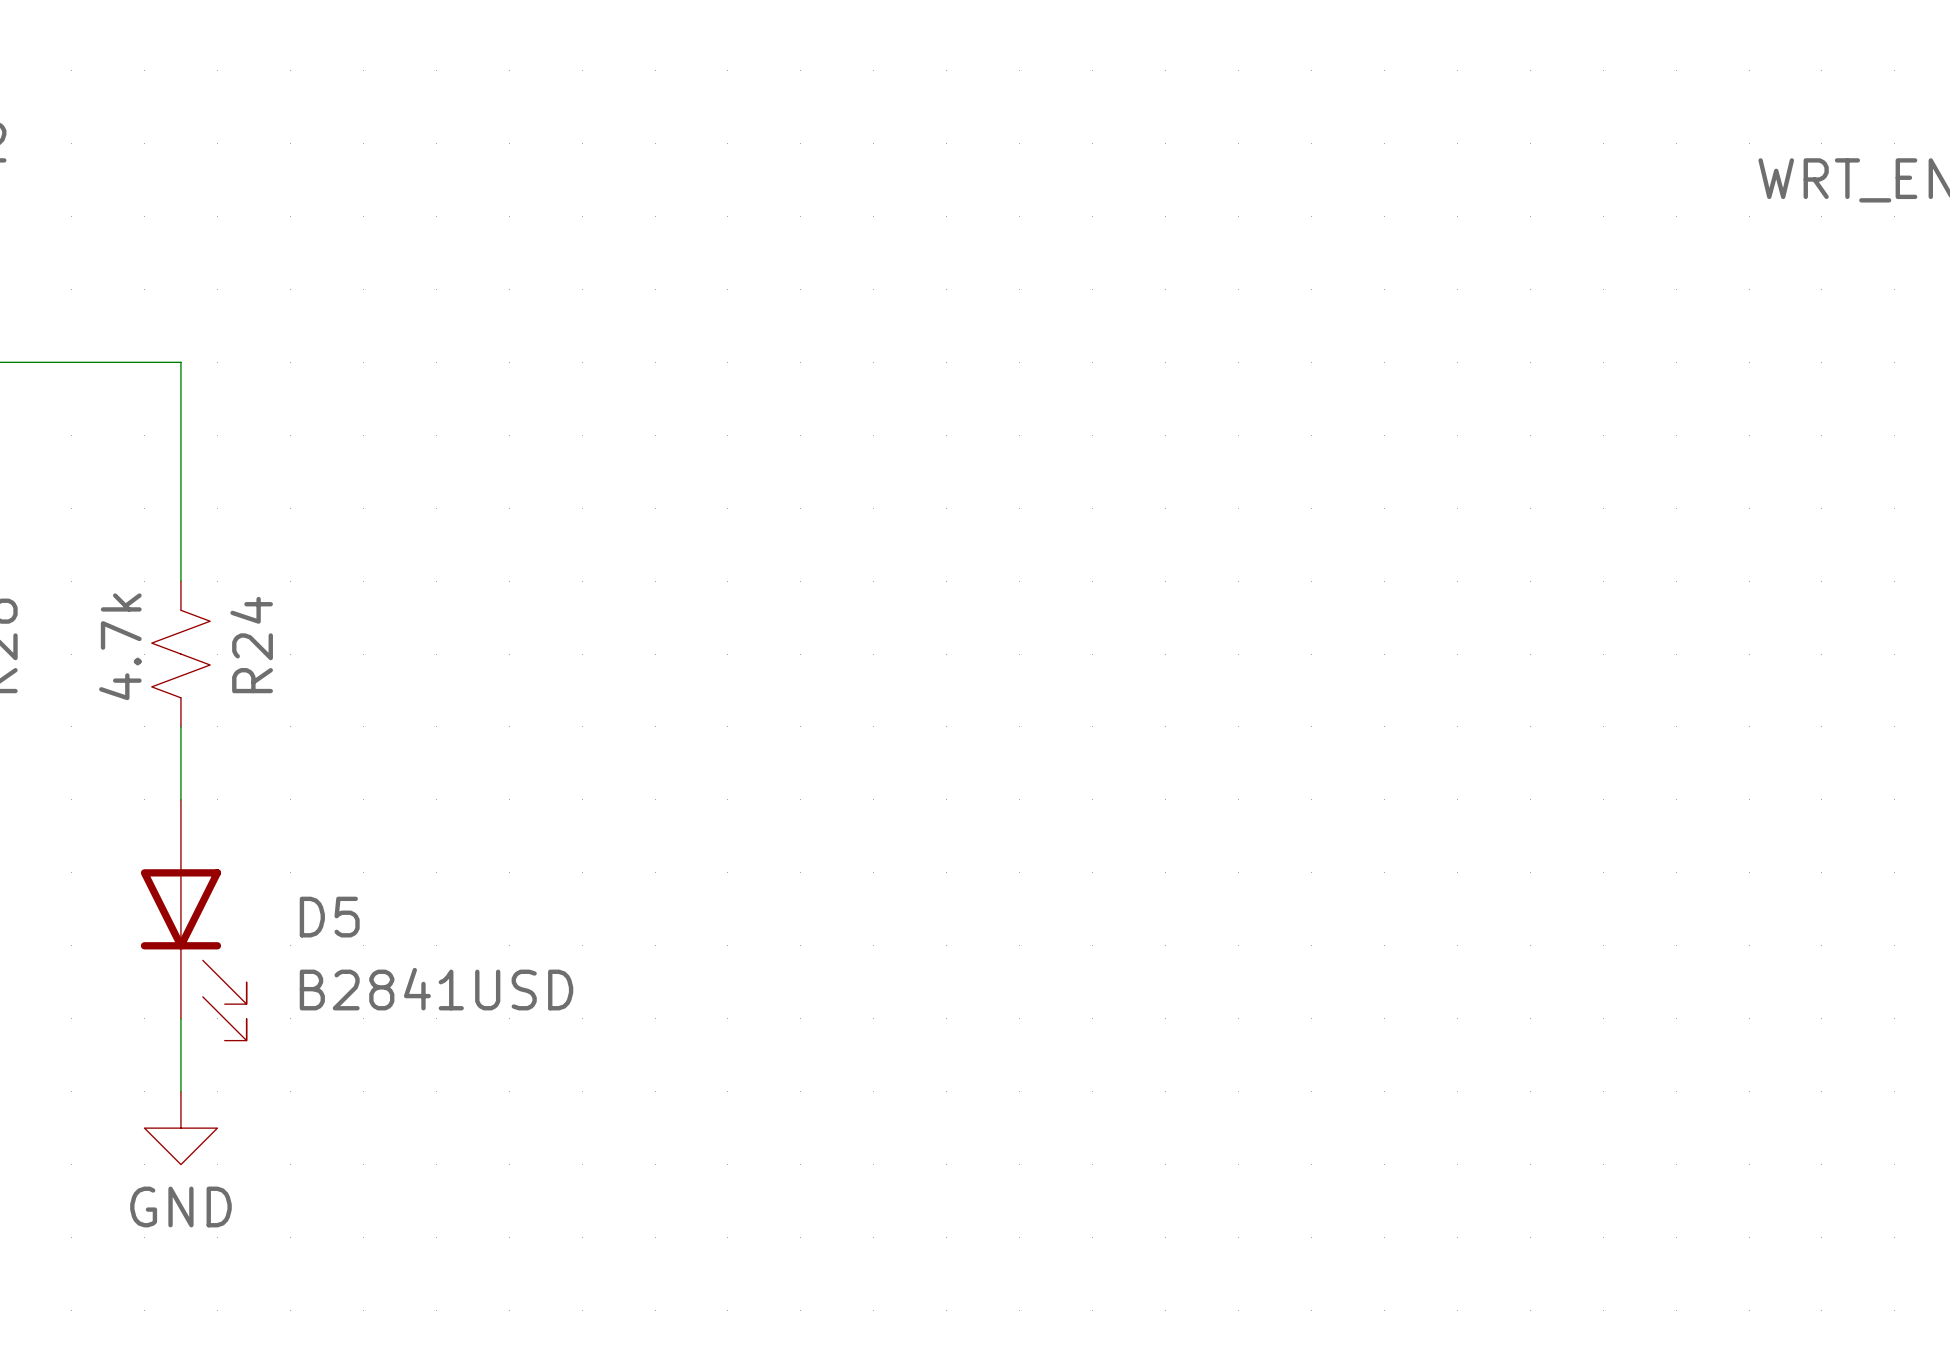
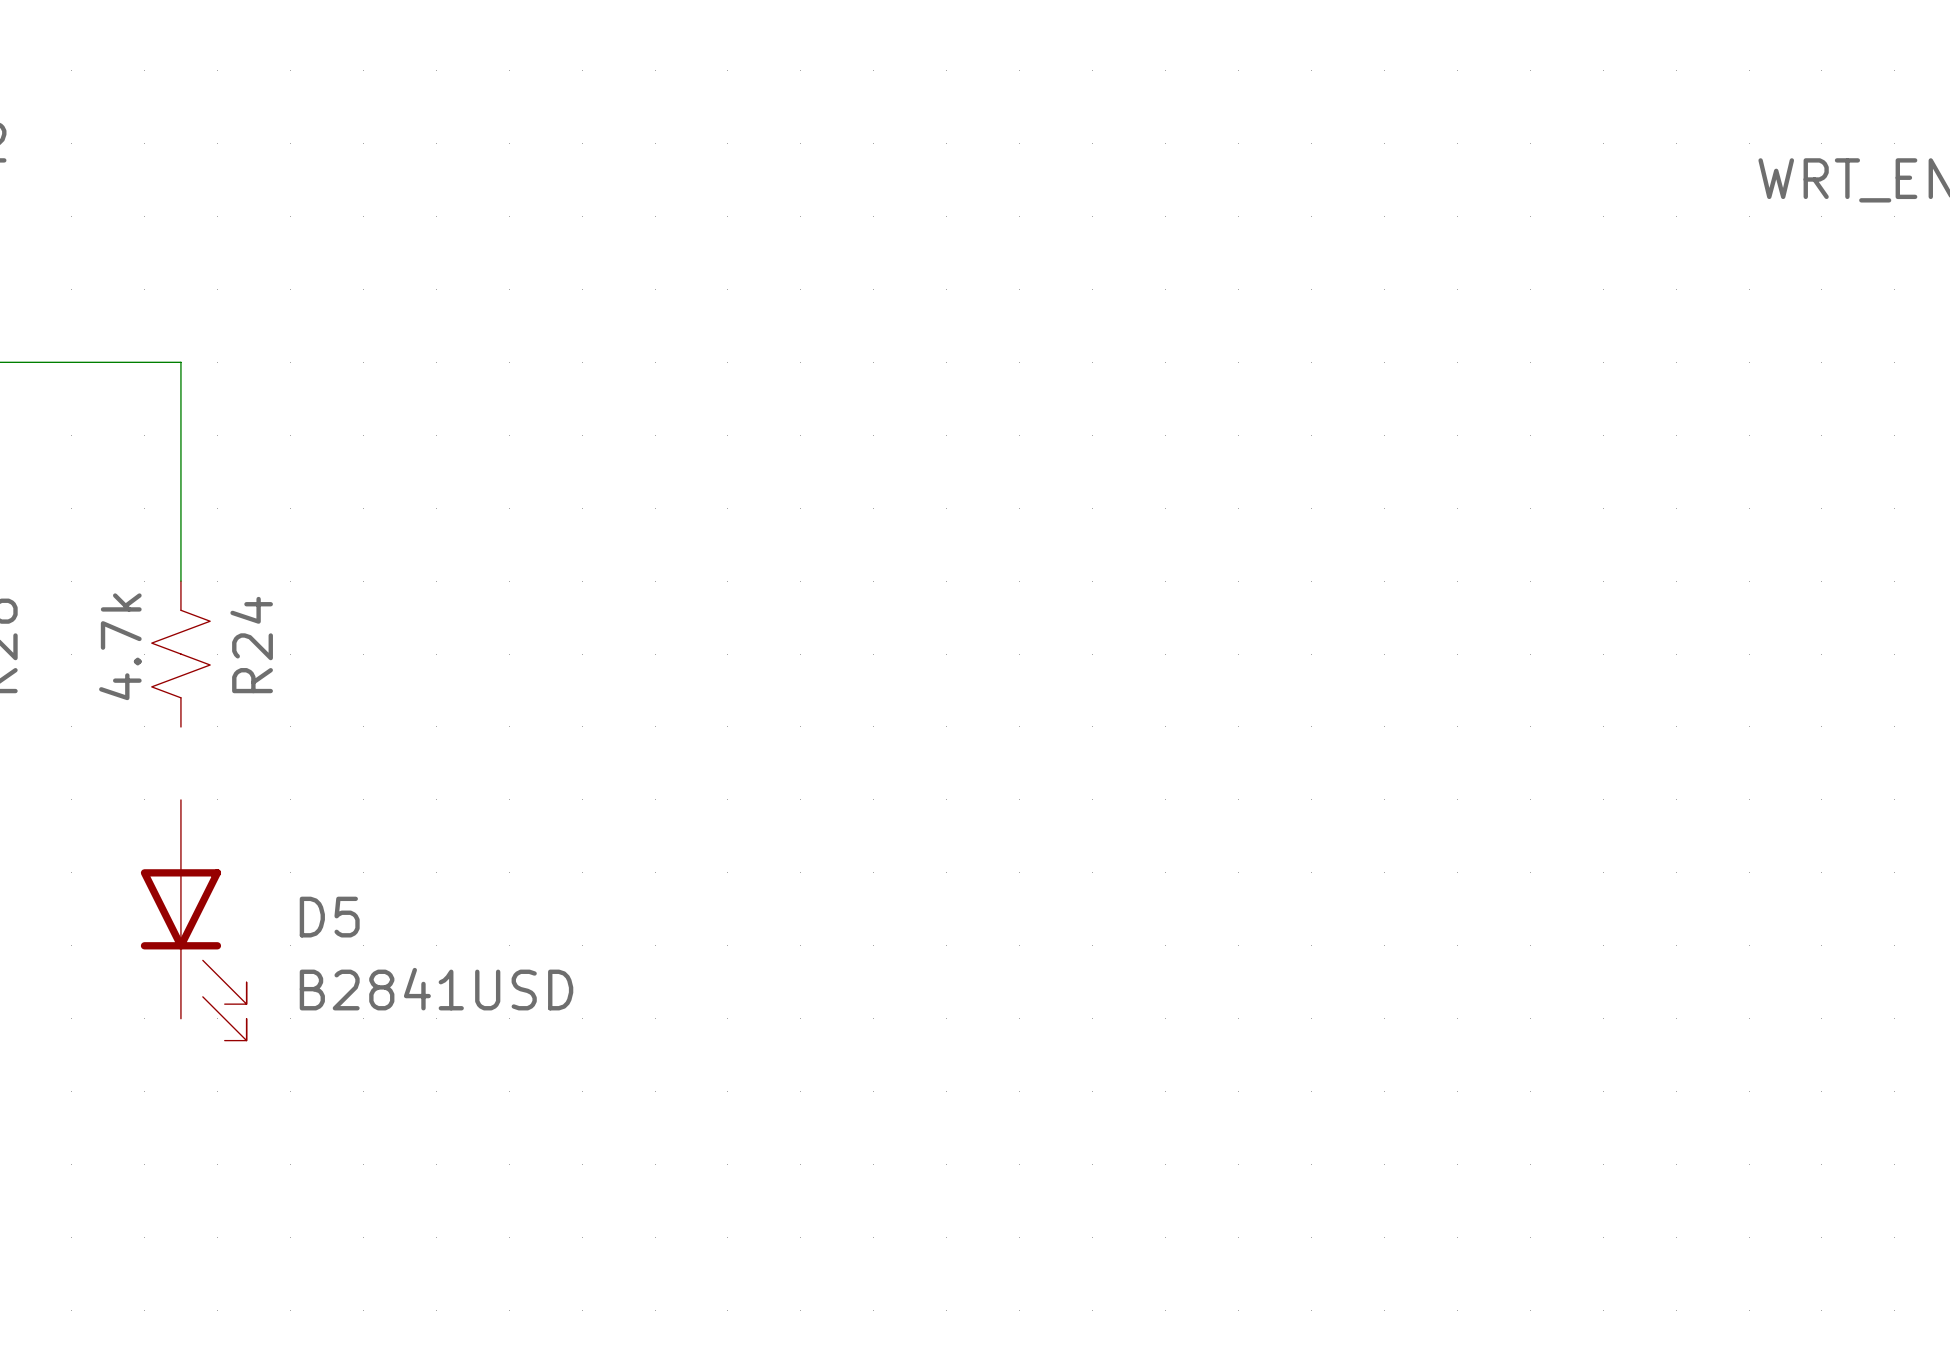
wire: (180, 726) (180, 799) -> none
wire: (180, 1018) (180, 1091) -> none
power symbol: GND (180, 1128) -> none

